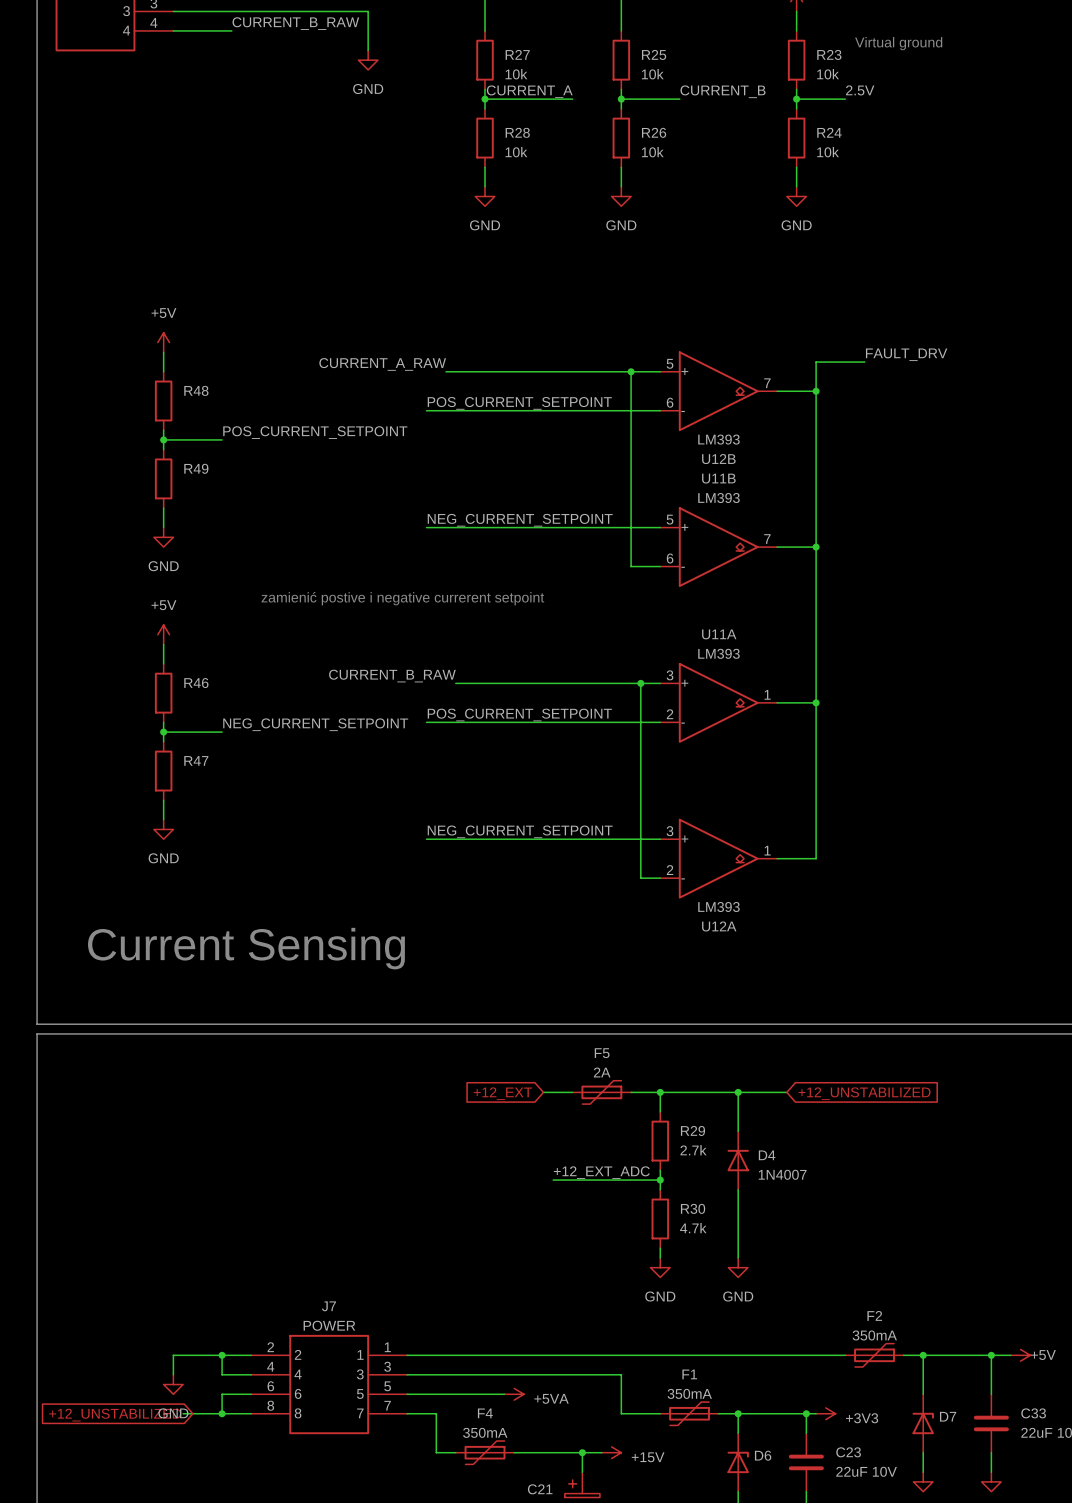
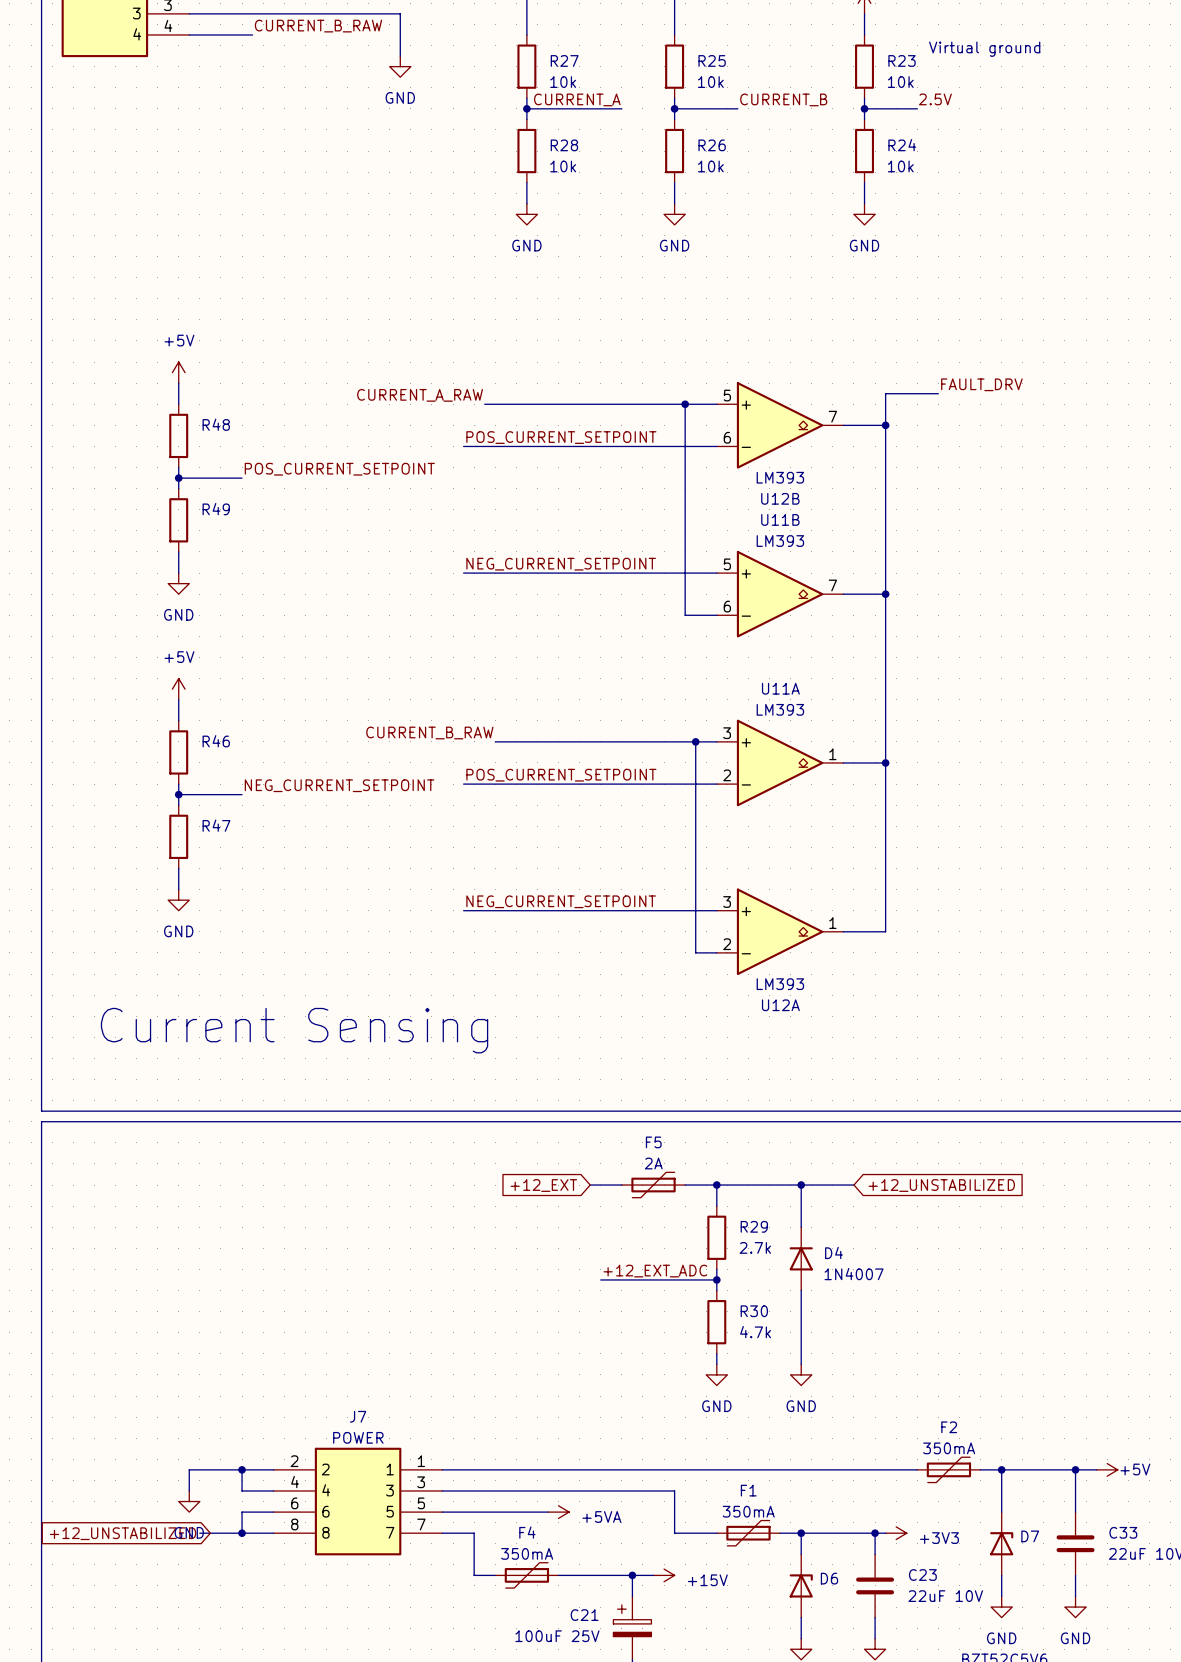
text: zamienić postive i negative currerent setpoint (402, 598) -> none

